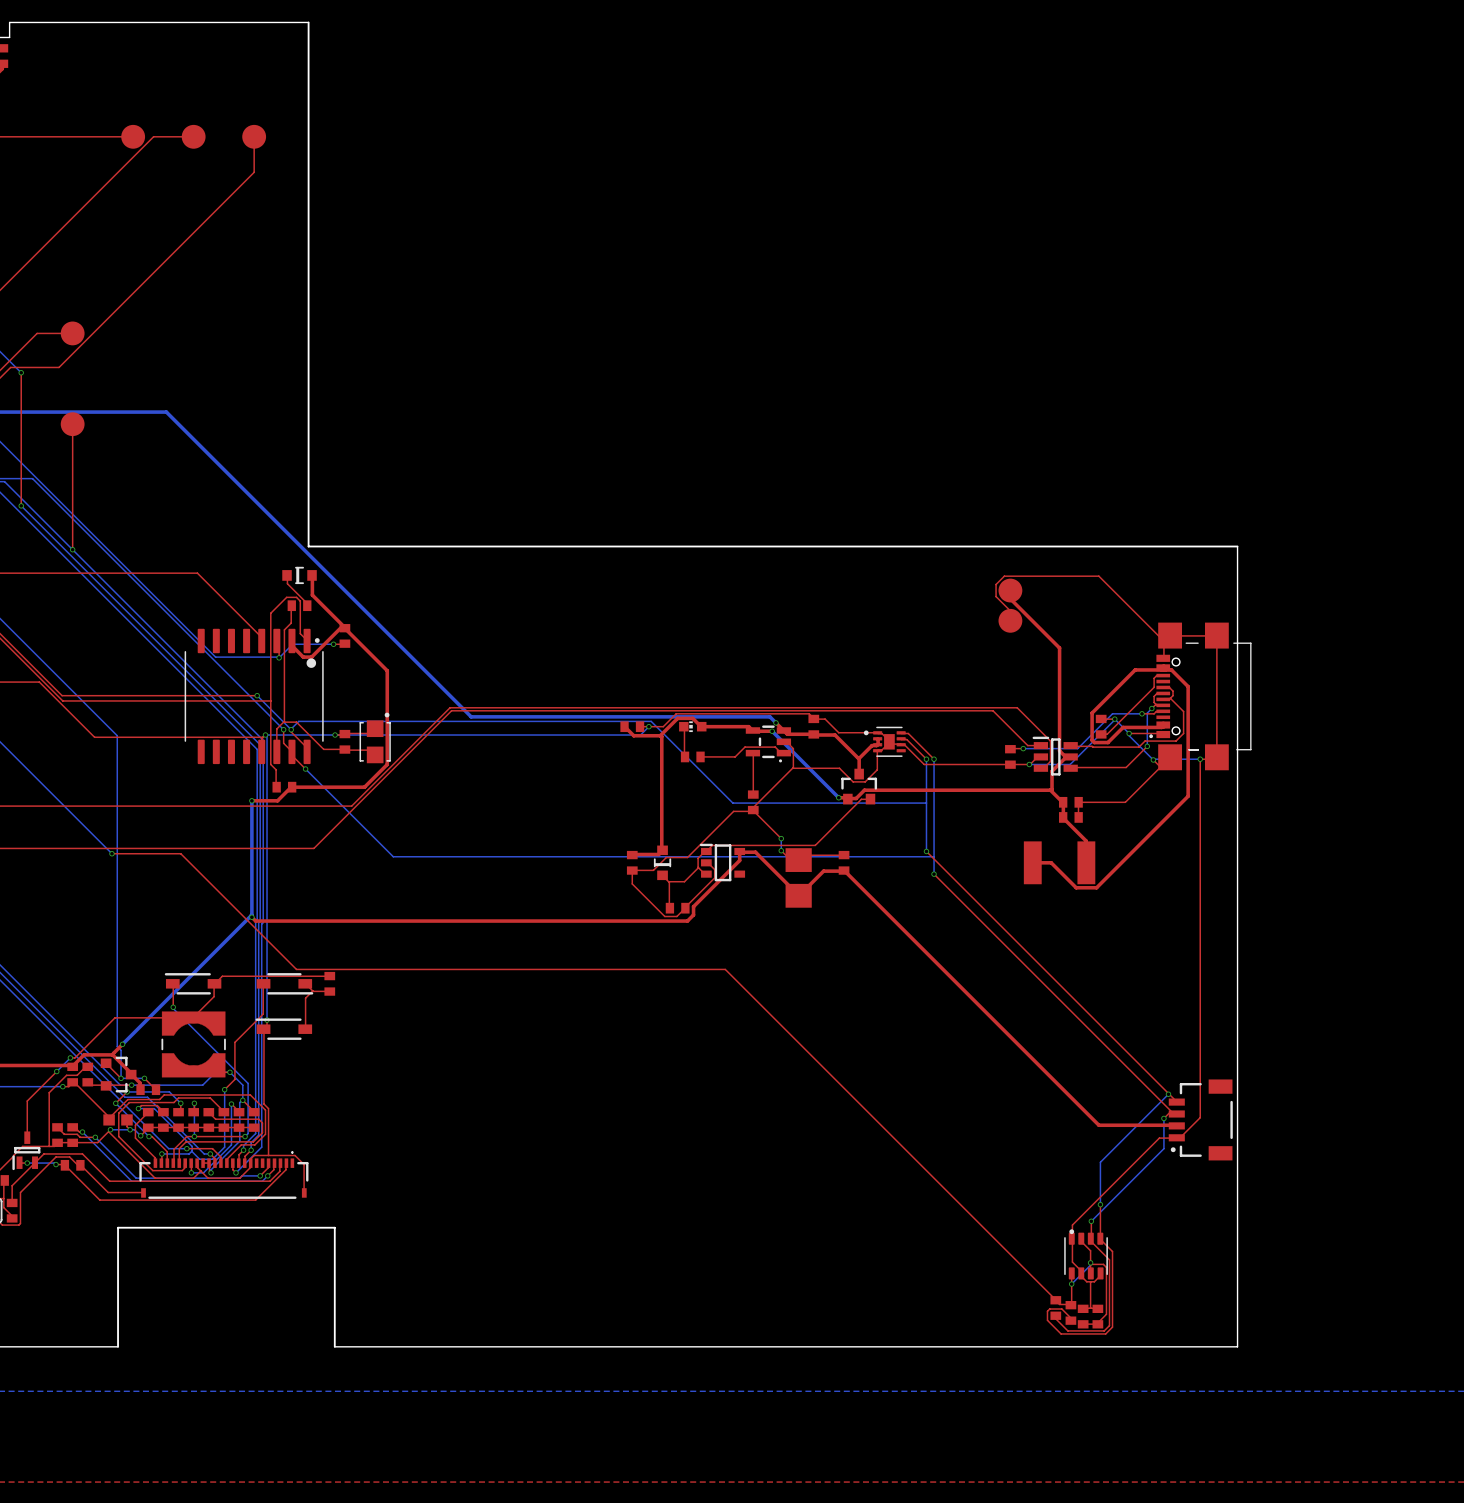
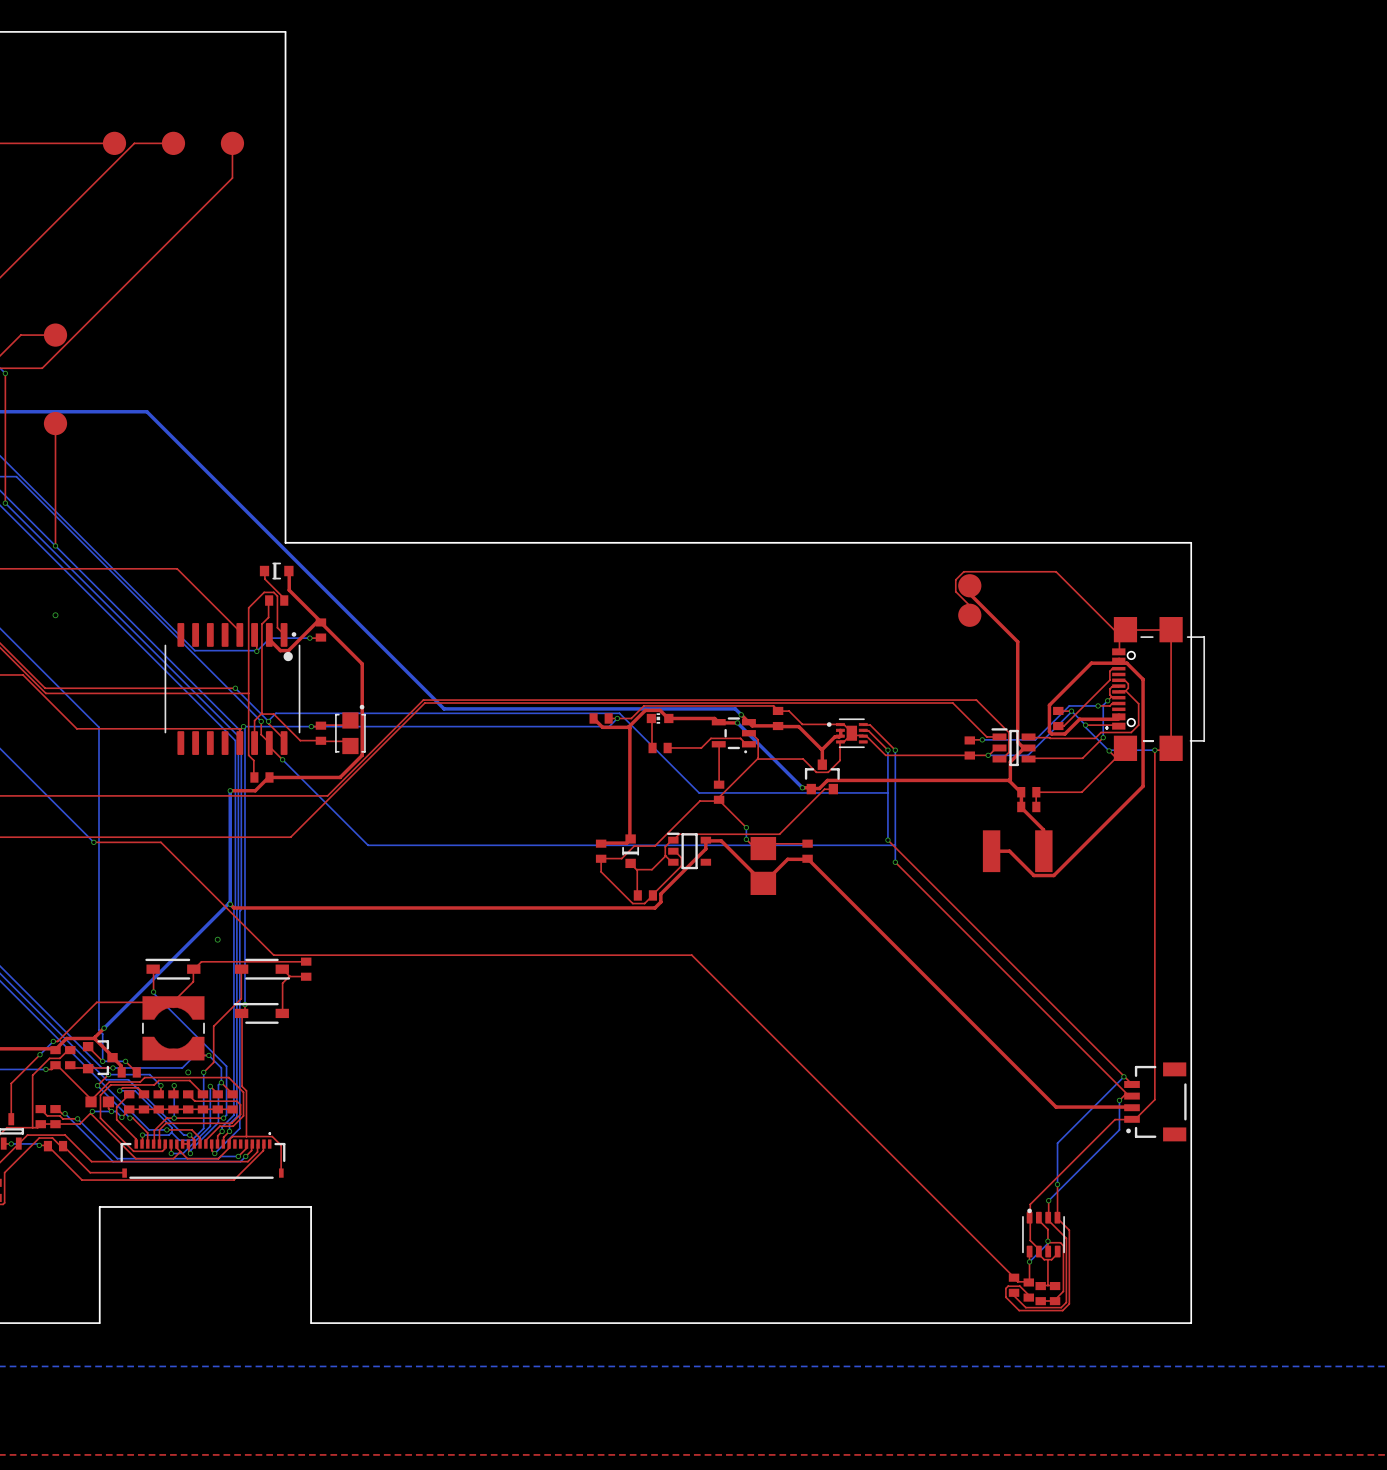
via: none -> (55, 615)
via: none -> (217, 939)
via: none -> (188, 1072)

